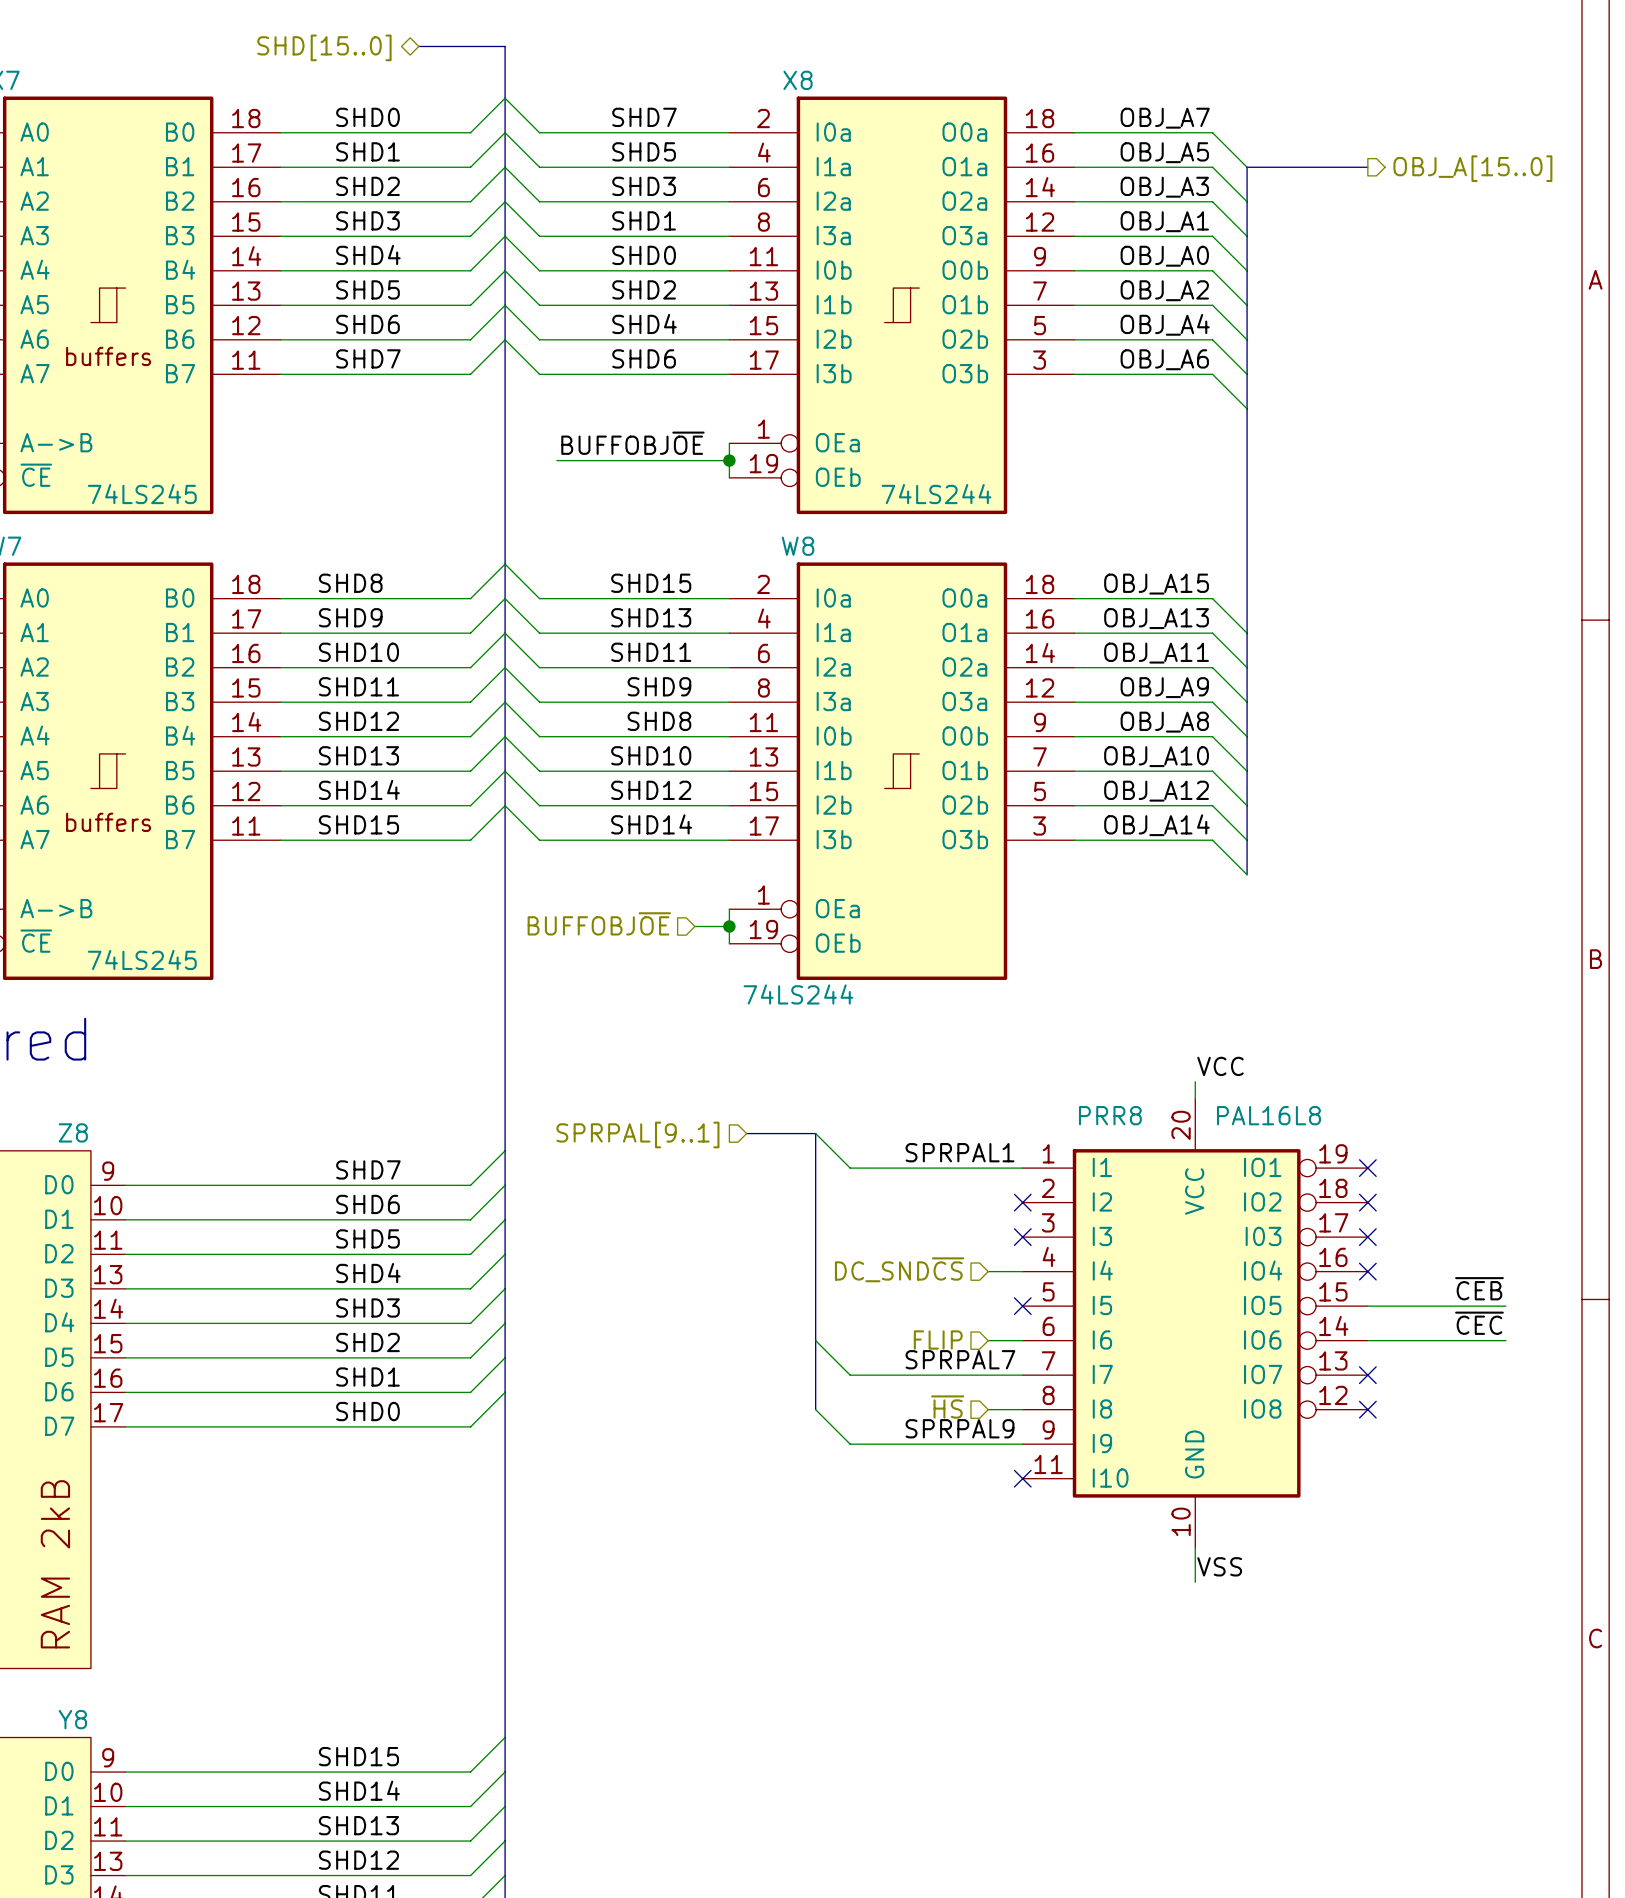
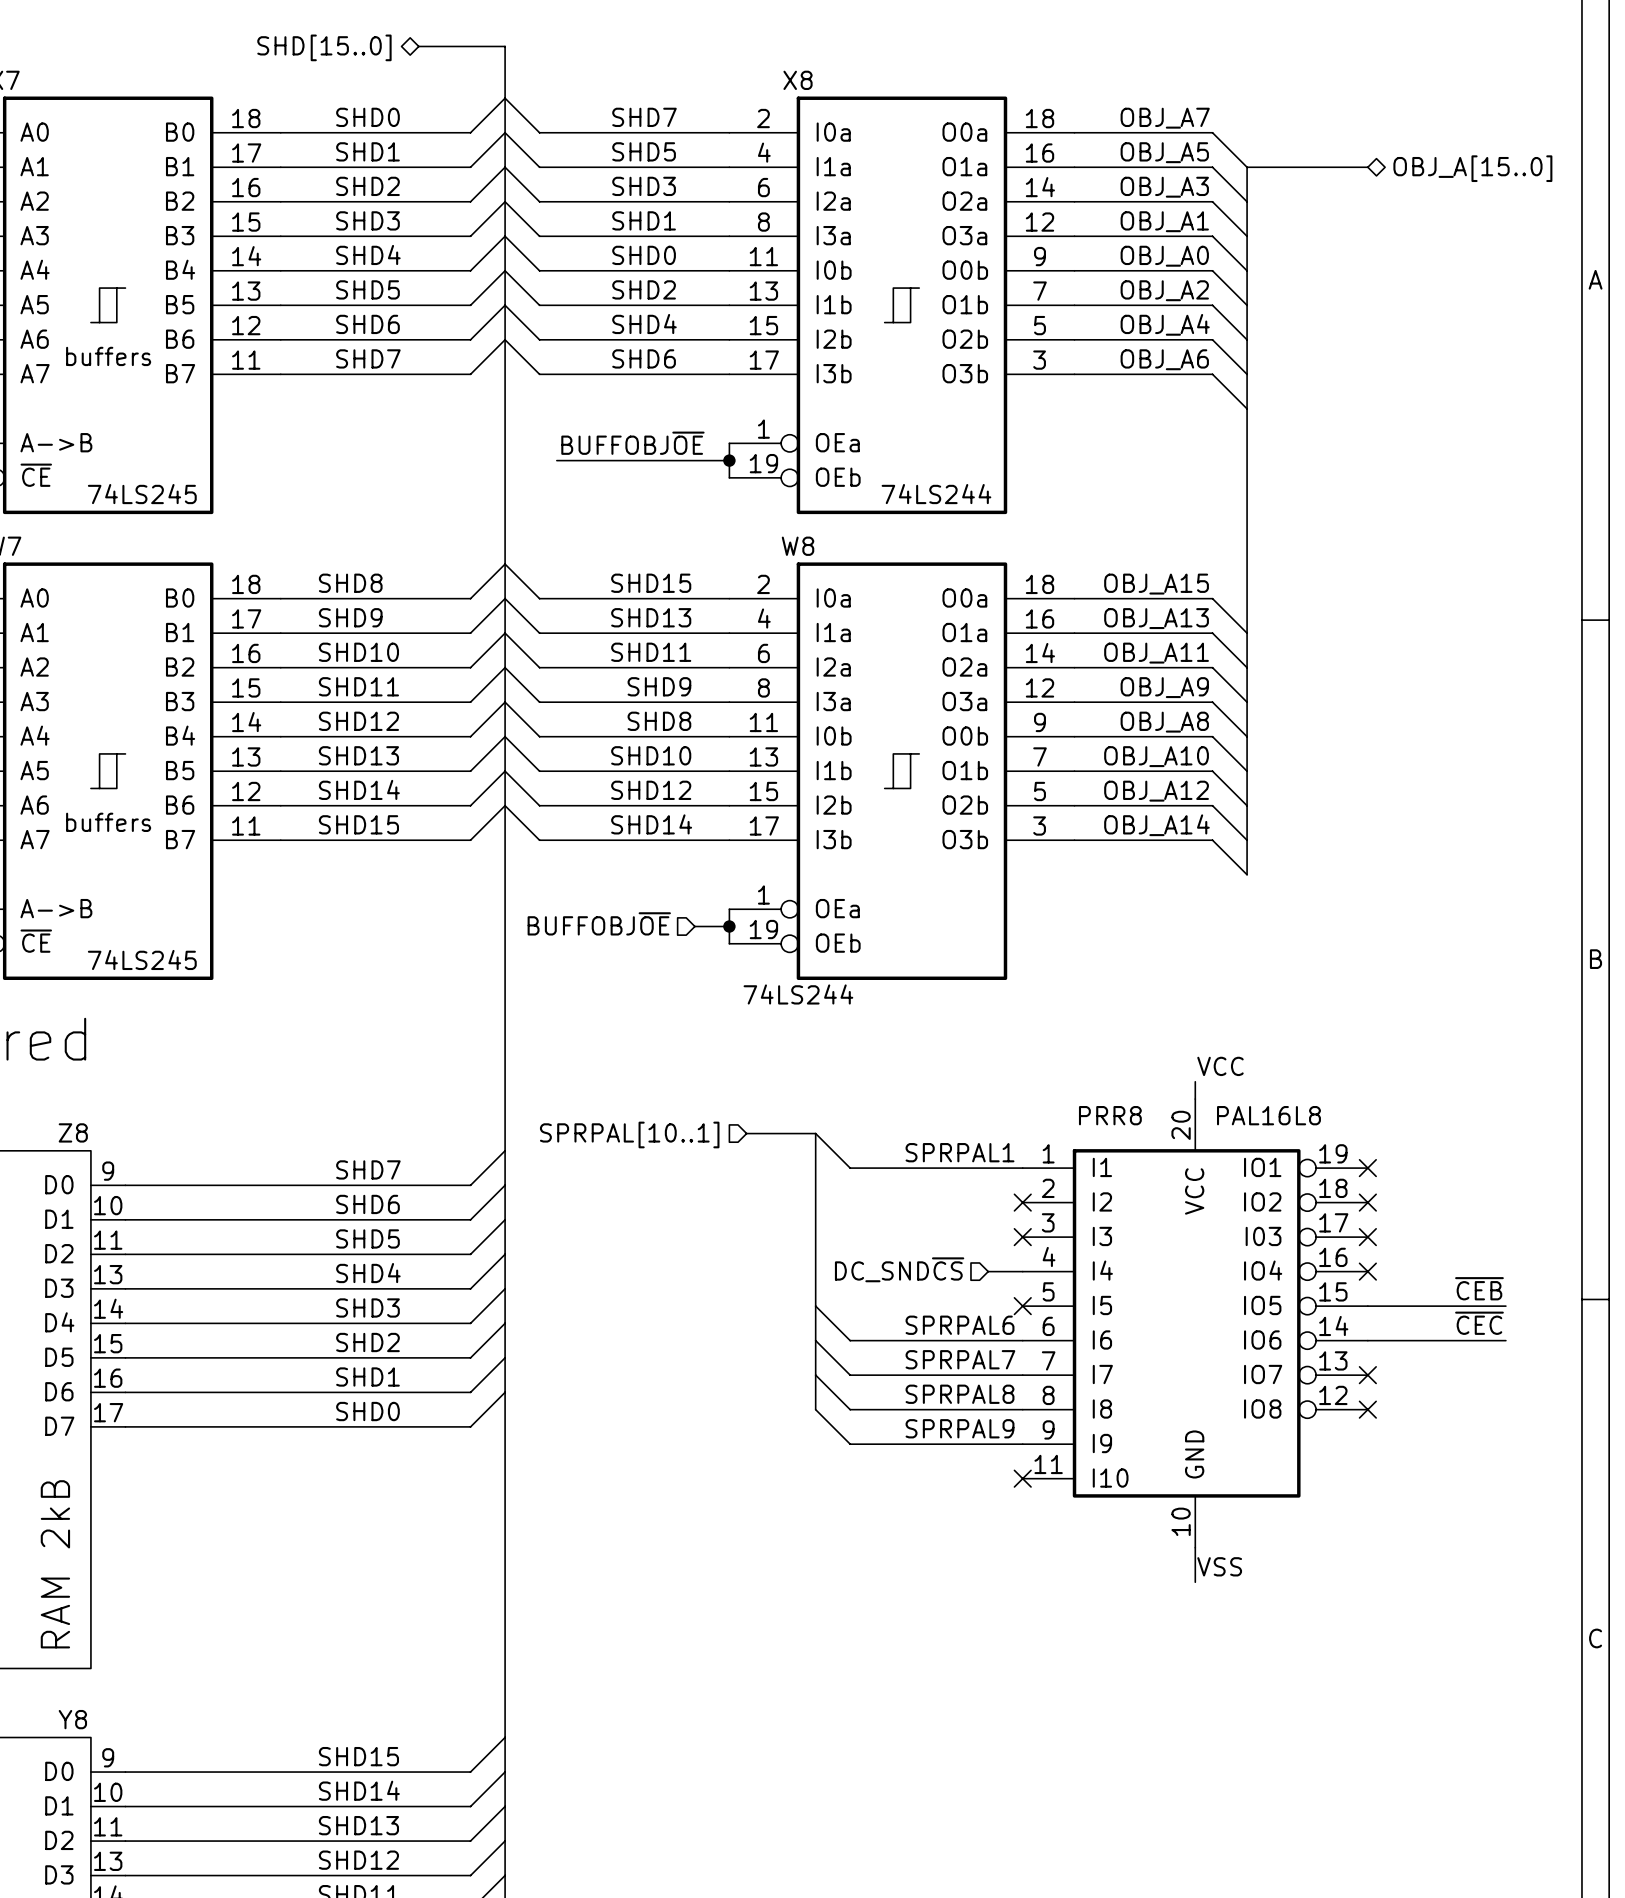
hierarchical label shape: output (1472, 168) -> bidirectional (1472, 168)
hierarchical label: SPRPAL[9..1] (637, 1134) -> SPRPAL[10..1] (629, 1134)
wire: none -> (815, 1306) (850, 1340) (988, 1340)
label: none -> SPRPAL6 (960, 1325)
hierarchical label: FLIP (938, 1339) -> none
wire: none -> (815, 1375) (850, 1409) (988, 1409)
label: none -> SPRPAL8 (960, 1394)
hierarchical label: ~{HS} (947, 1407) -> none

